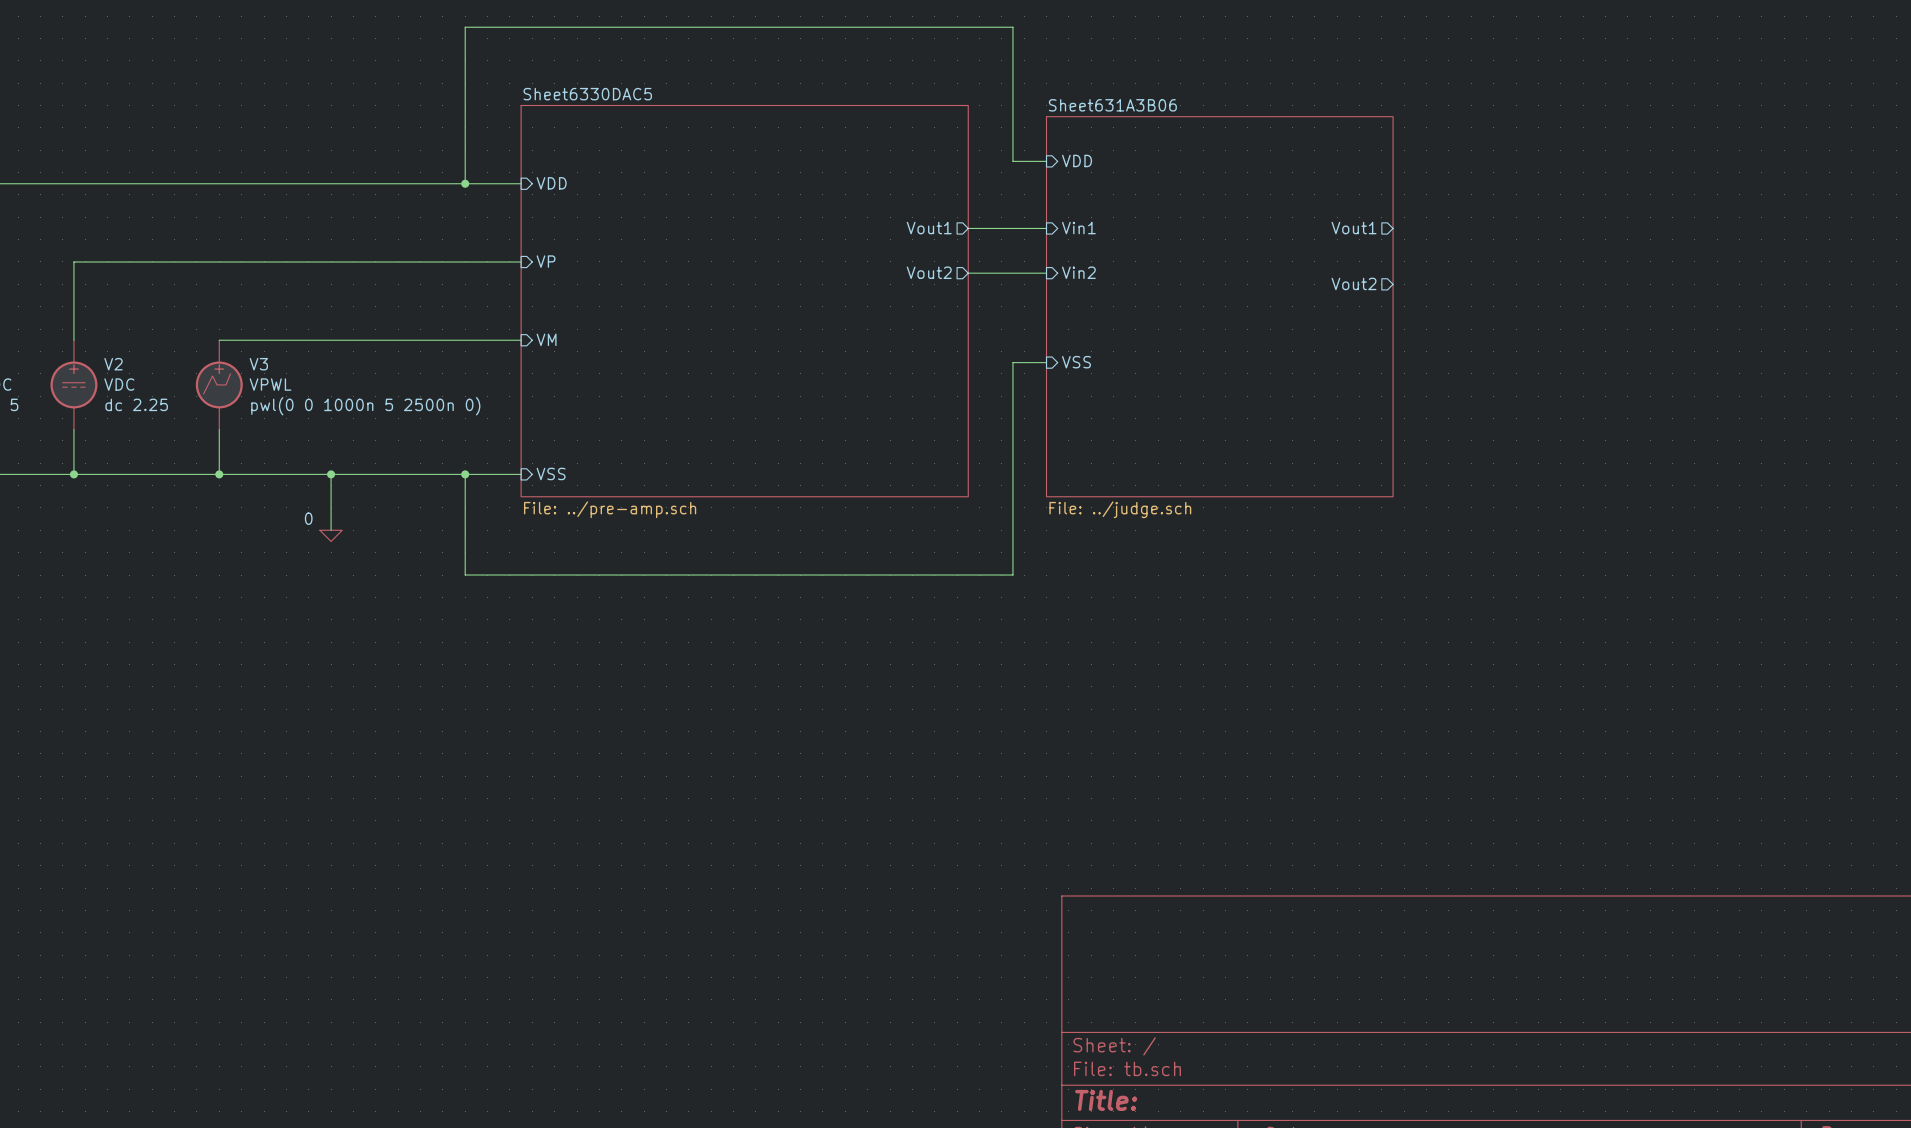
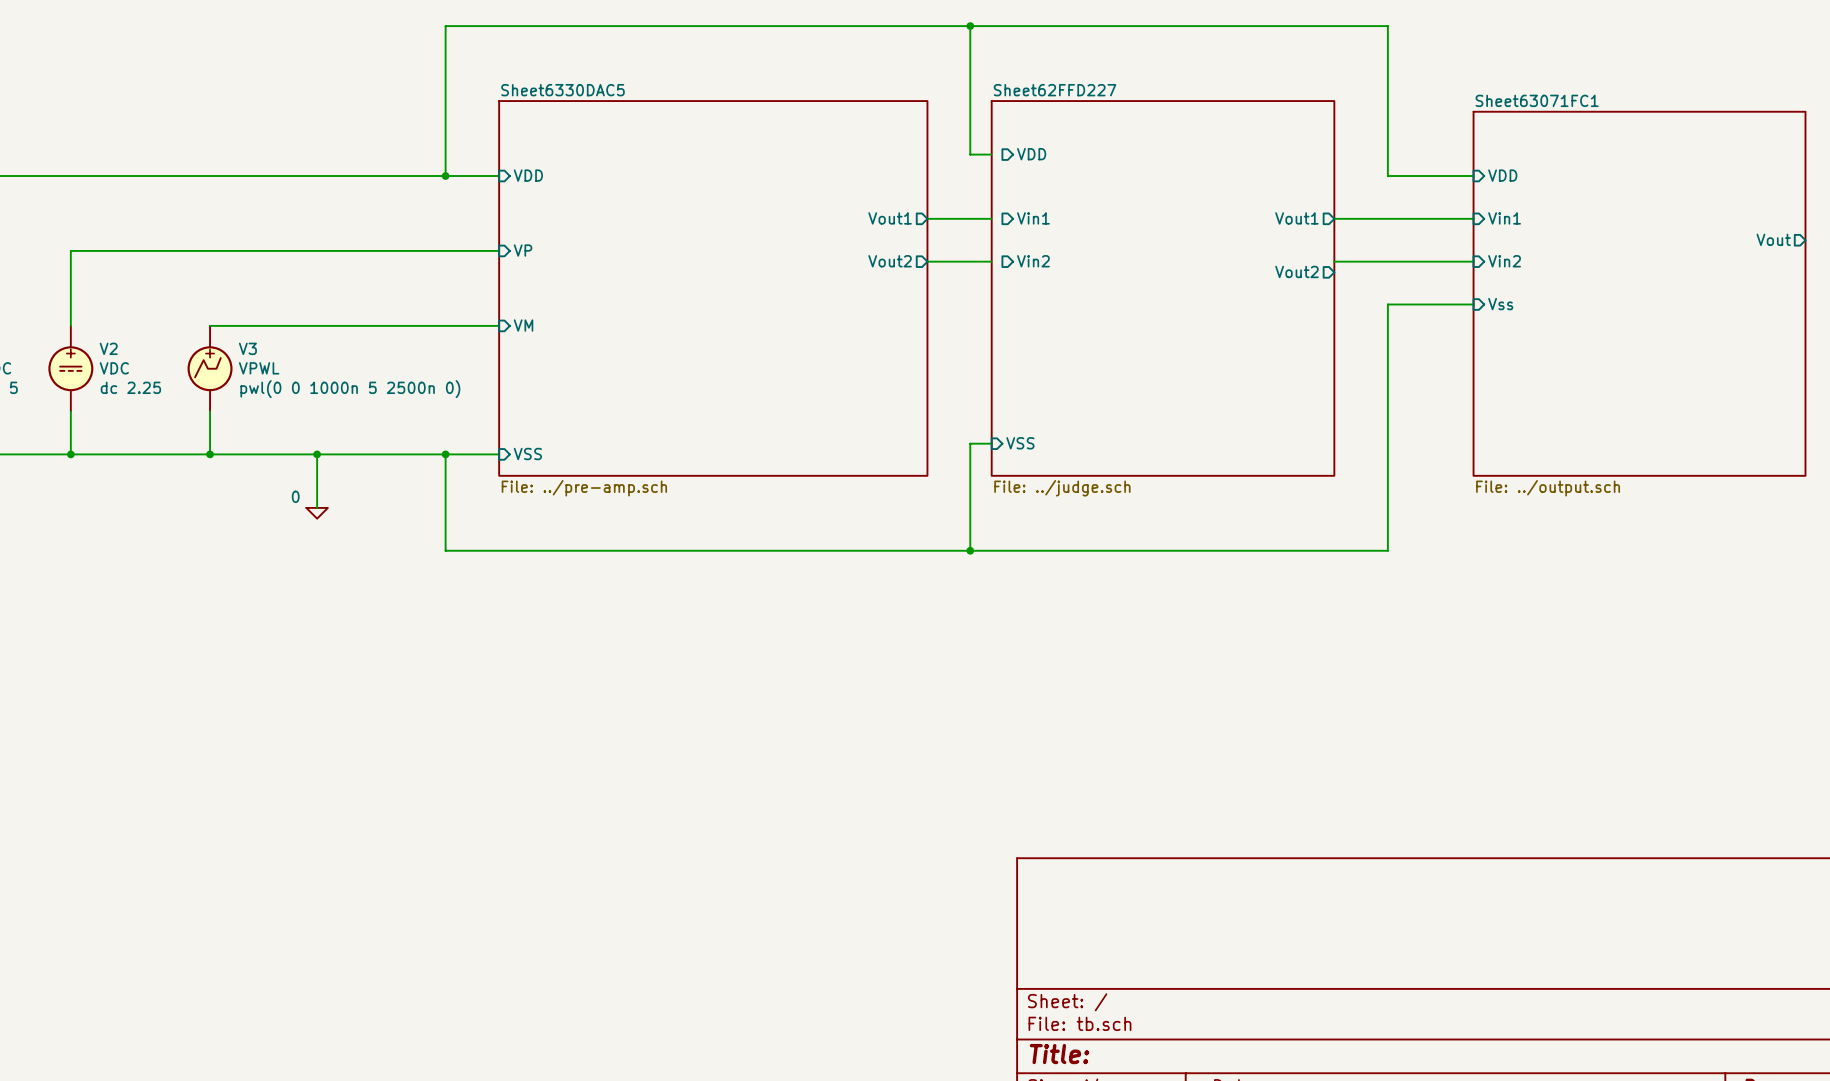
wire: none -> (970, 26) (1387, 26) (1387, 176) (1473, 176)
junction: none -> (970, 26)
wire: (1035, 161) (1046, 161) -> none
sheet pin: none -> VDD (1502, 175)
wire: (1035, 228) (1046, 228) -> none
wire: none -> (1334, 218) (1473, 218)
sheet pin: none -> Vin1 (1504, 218)
sheet pin: none -> Vout (1773, 239)
sheet pin: none -> Vin2 (1504, 261)
wire: (1035, 273) (1046, 273) -> none
wire: none -> (1334, 261) (1473, 261)
sheet Sheet62FFD227: none -> File: ../judge.sch (1163, 288)
sheet Sheet631A3B06: File: ../judge.sch (1219, 306) -> none
sheet Sheet63071FC1: none -> File: ../output.sch (1639, 293)
wire: none -> (1473, 304) (1387, 304) (1387, 550) (970, 550)
sheet pin: none -> Vss (1500, 304)
wire: (1046, 362) (1012, 362) (1012, 463) -> (991, 443) (970, 443)
sheet pin position: VSS (1076, 362) -> VSS (1020, 443)
junction: none -> (970, 550)

